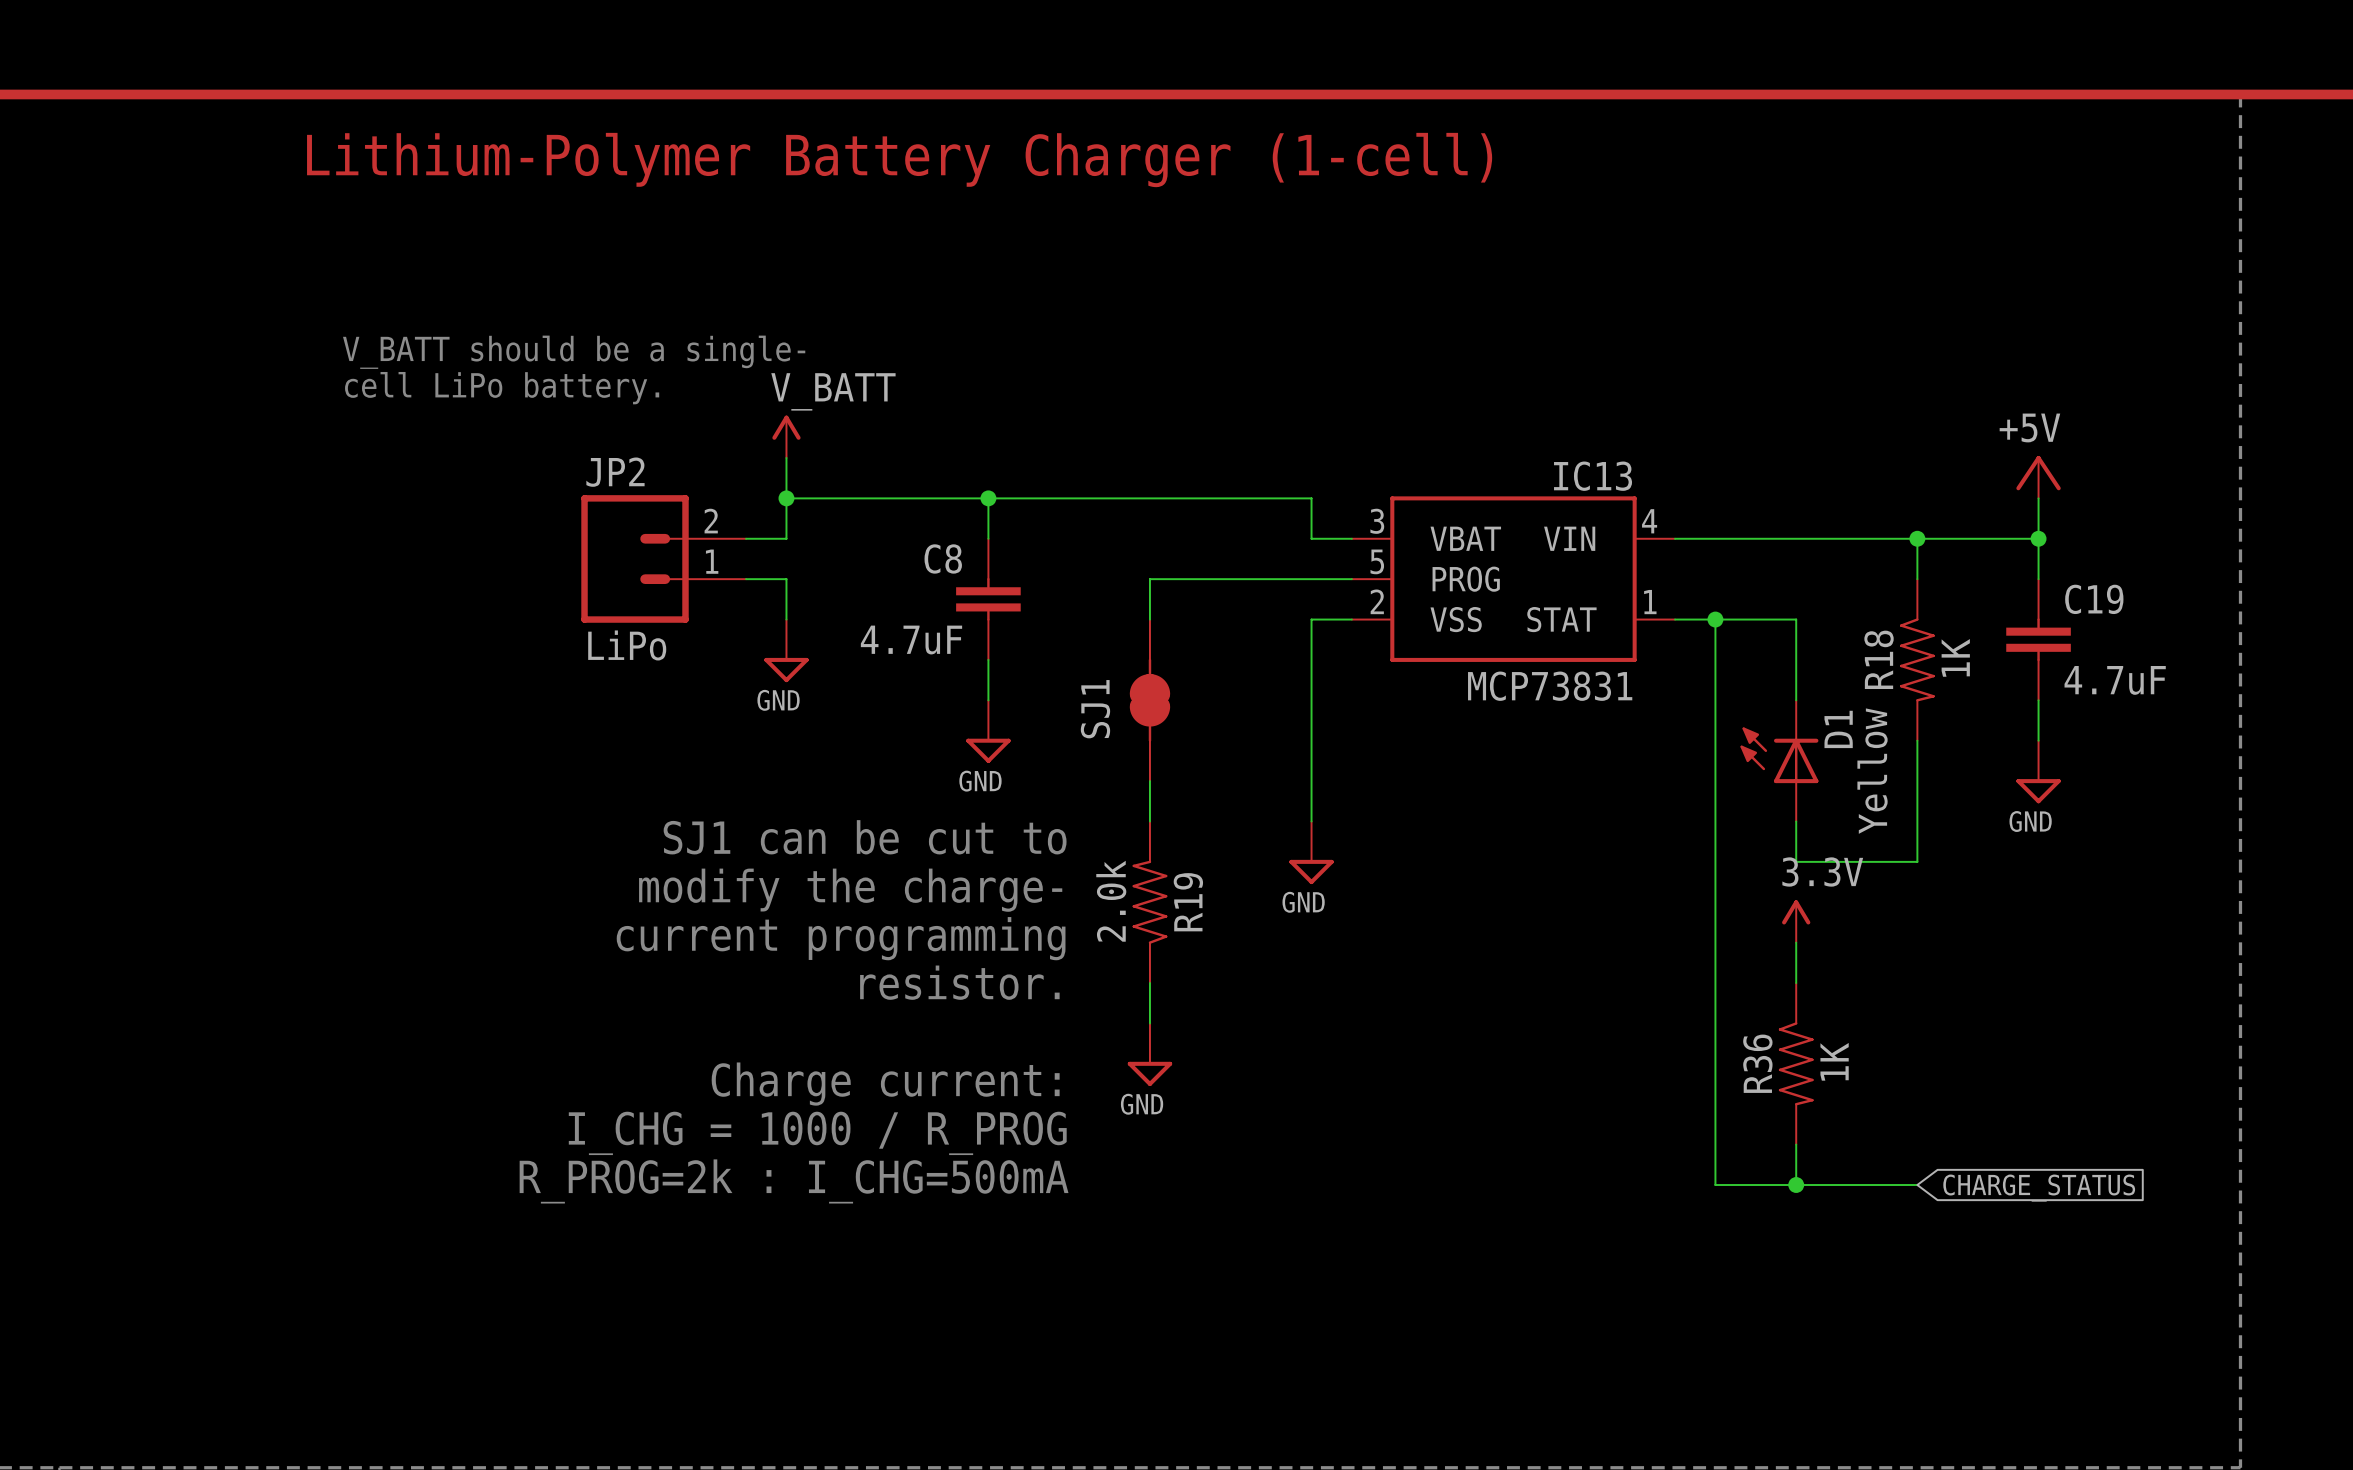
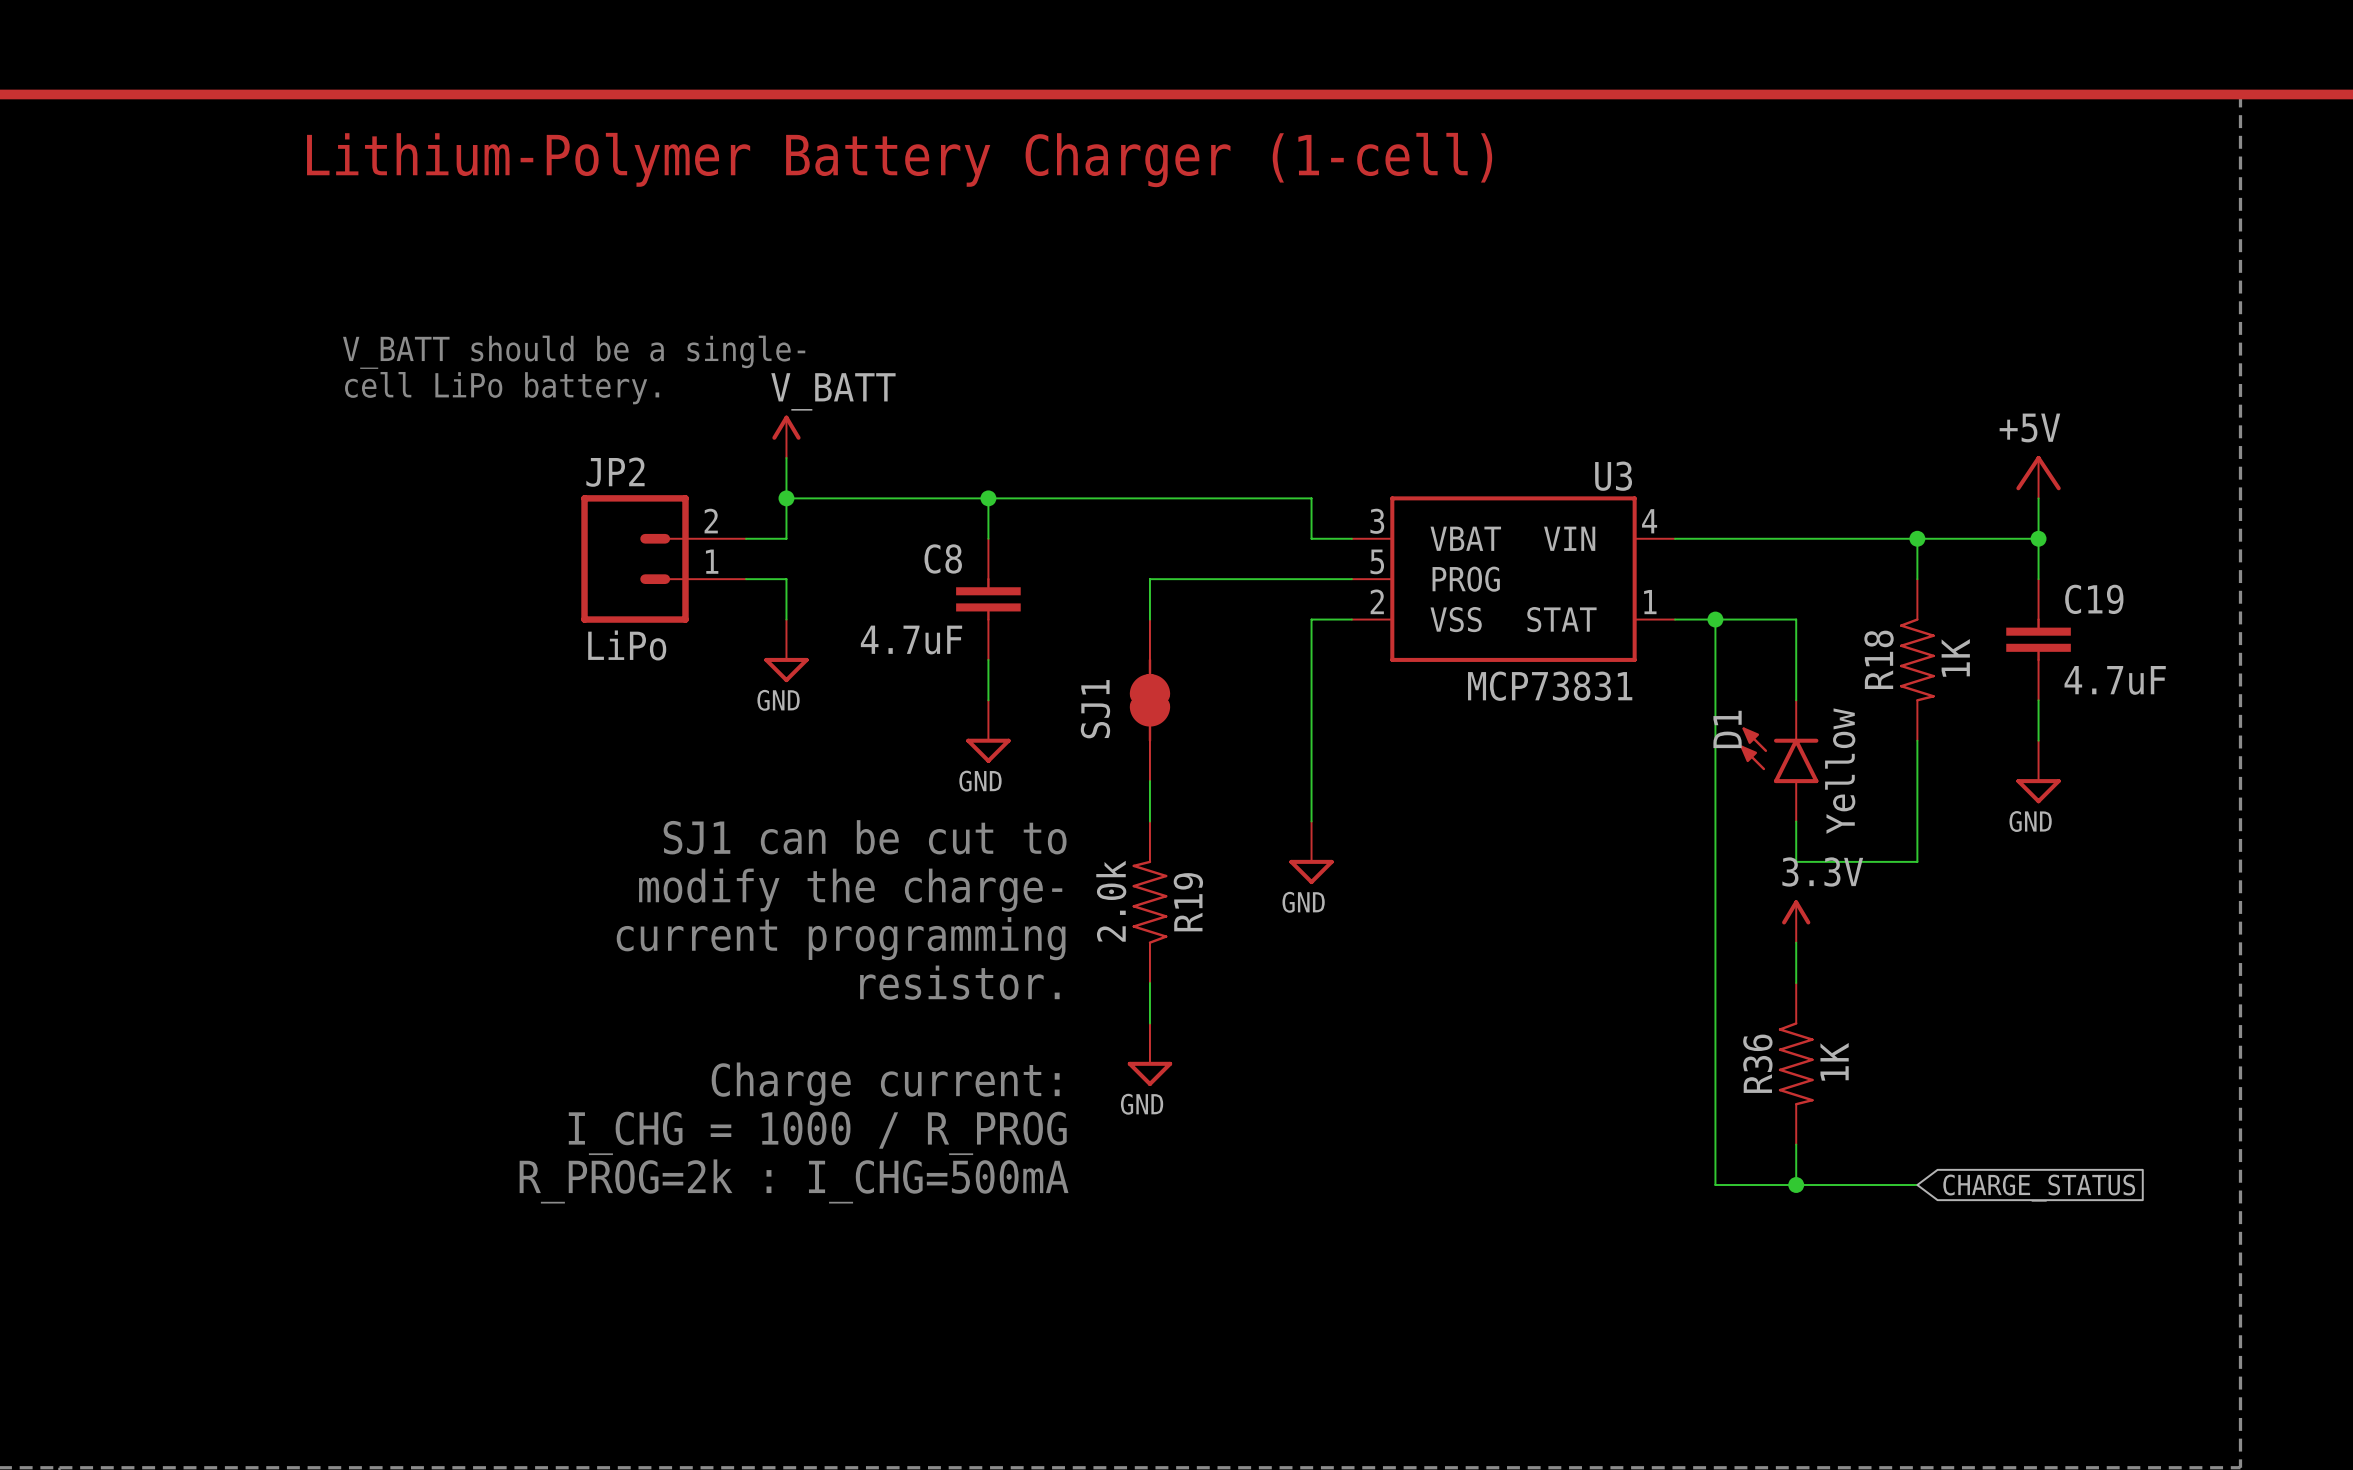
IC13 name: IC13 (1593, 476) -> U3 (1613, 476)
D1 symbol: [1740, 700, 1819, 822] -> [1740, 700, 1819, 822]
D1 name position: D1 (1838, 729) -> D1 (1727, 729)
D1 value position: Yellow (1872, 771) -> Yellow (1840, 771)

